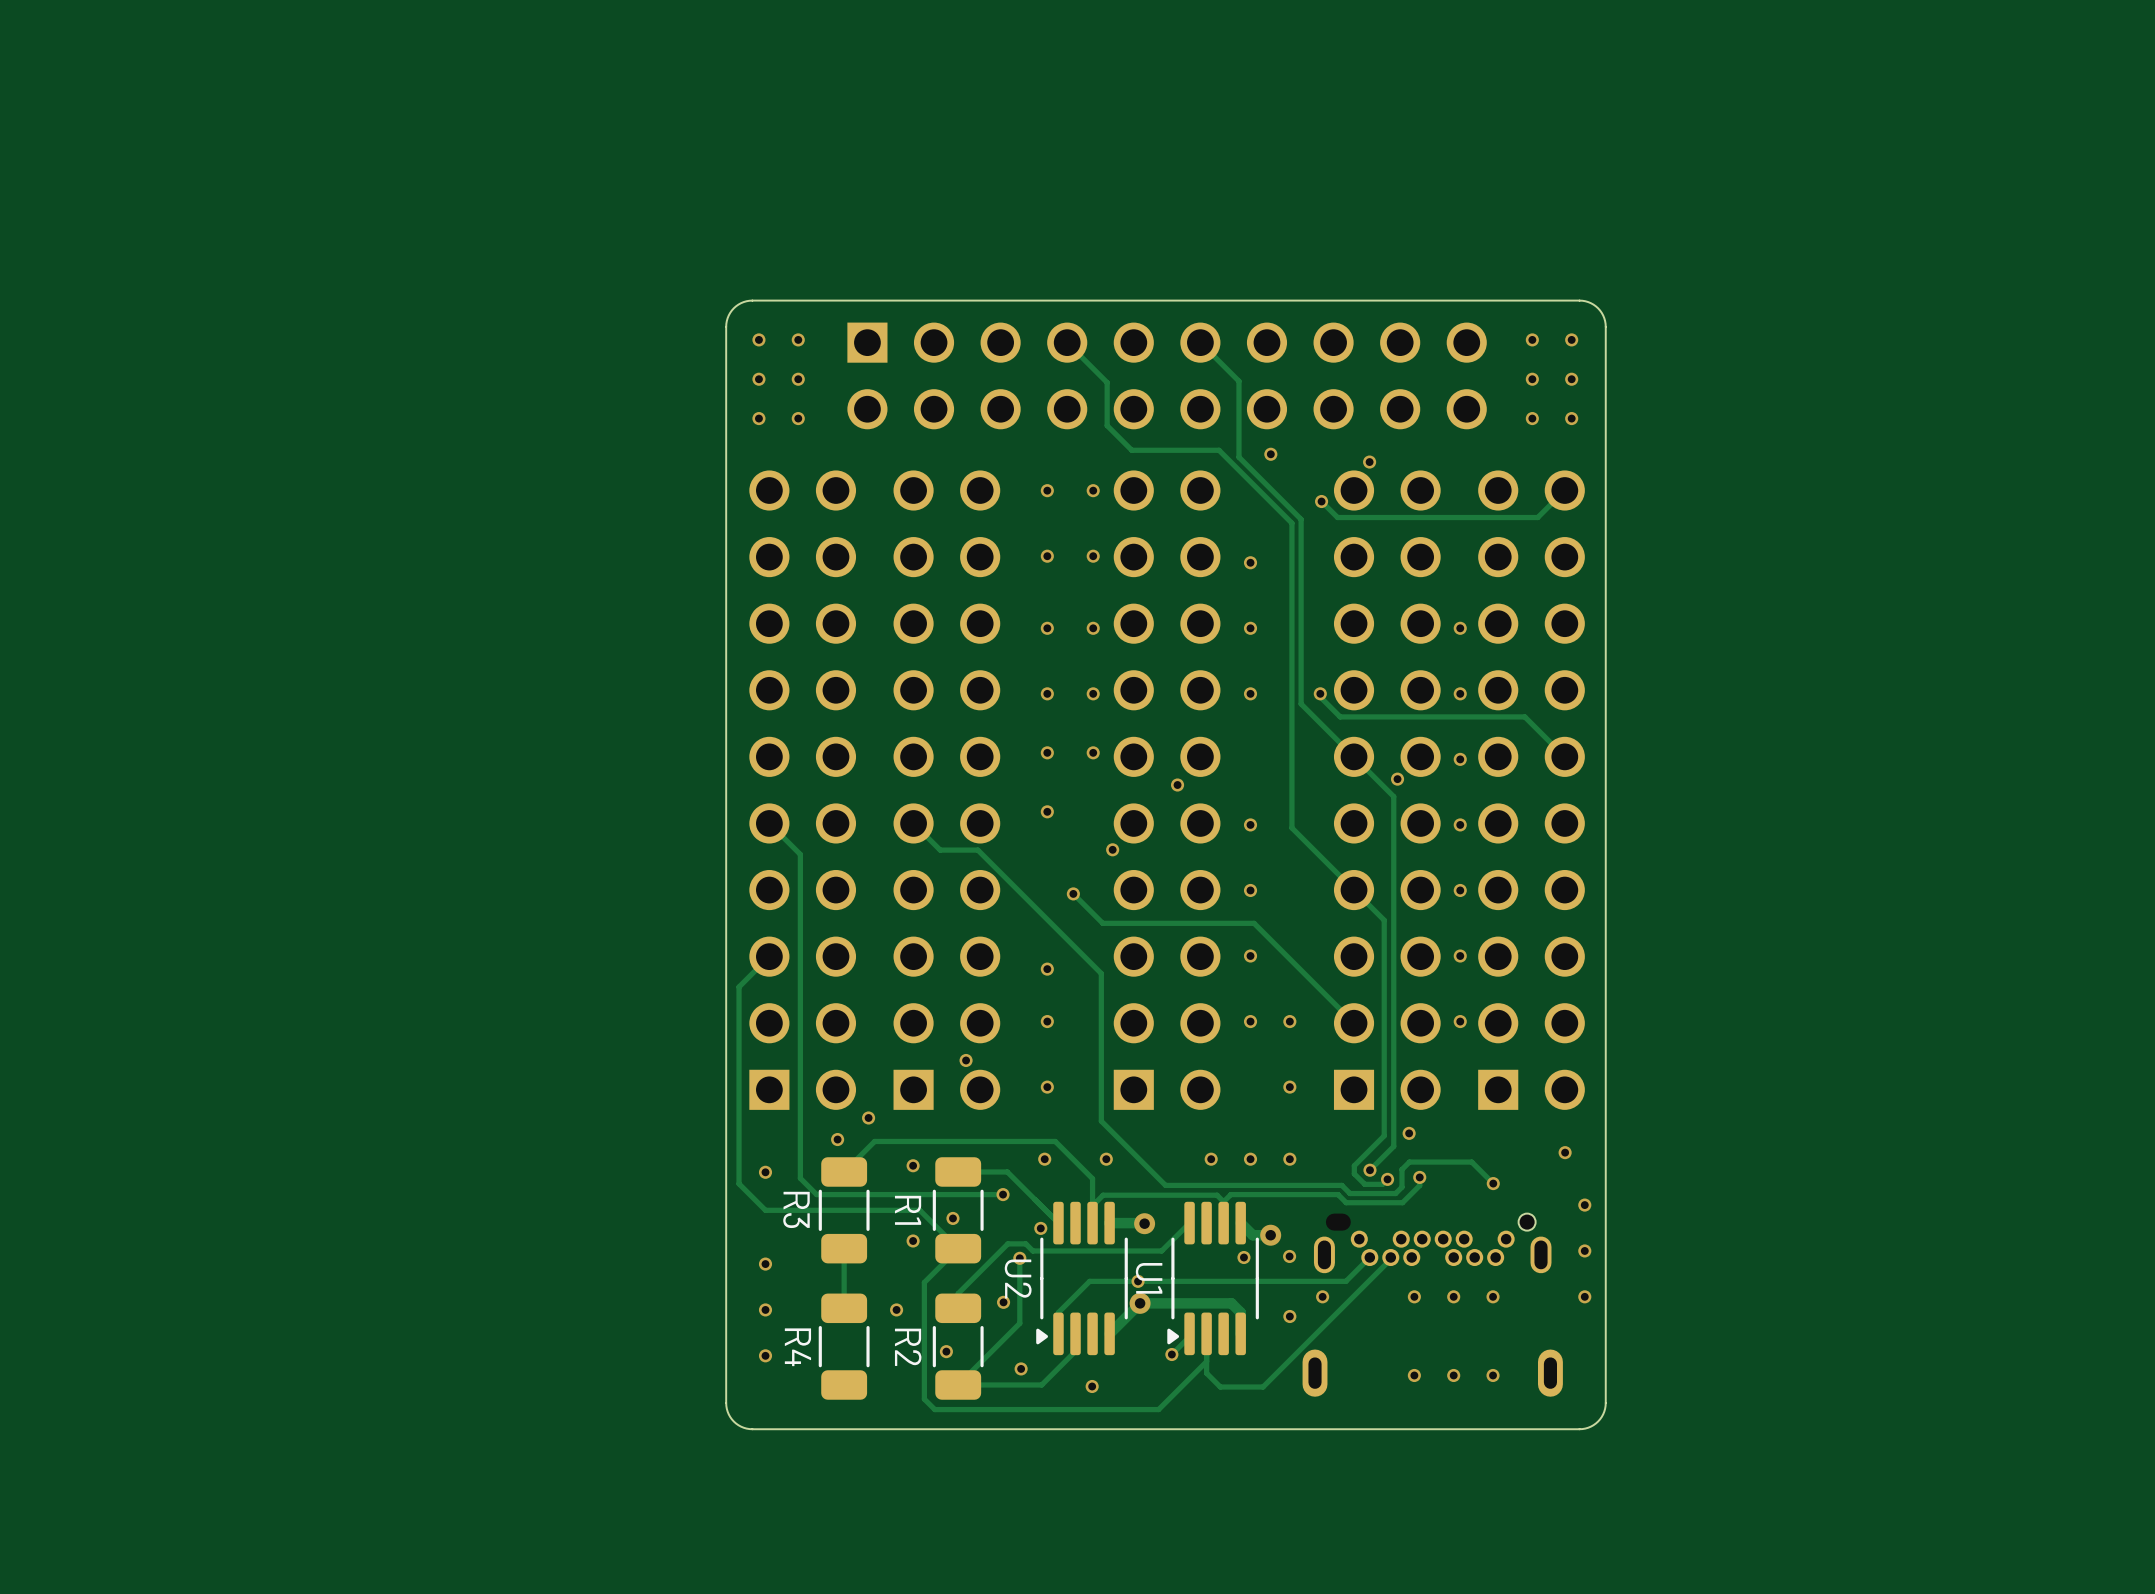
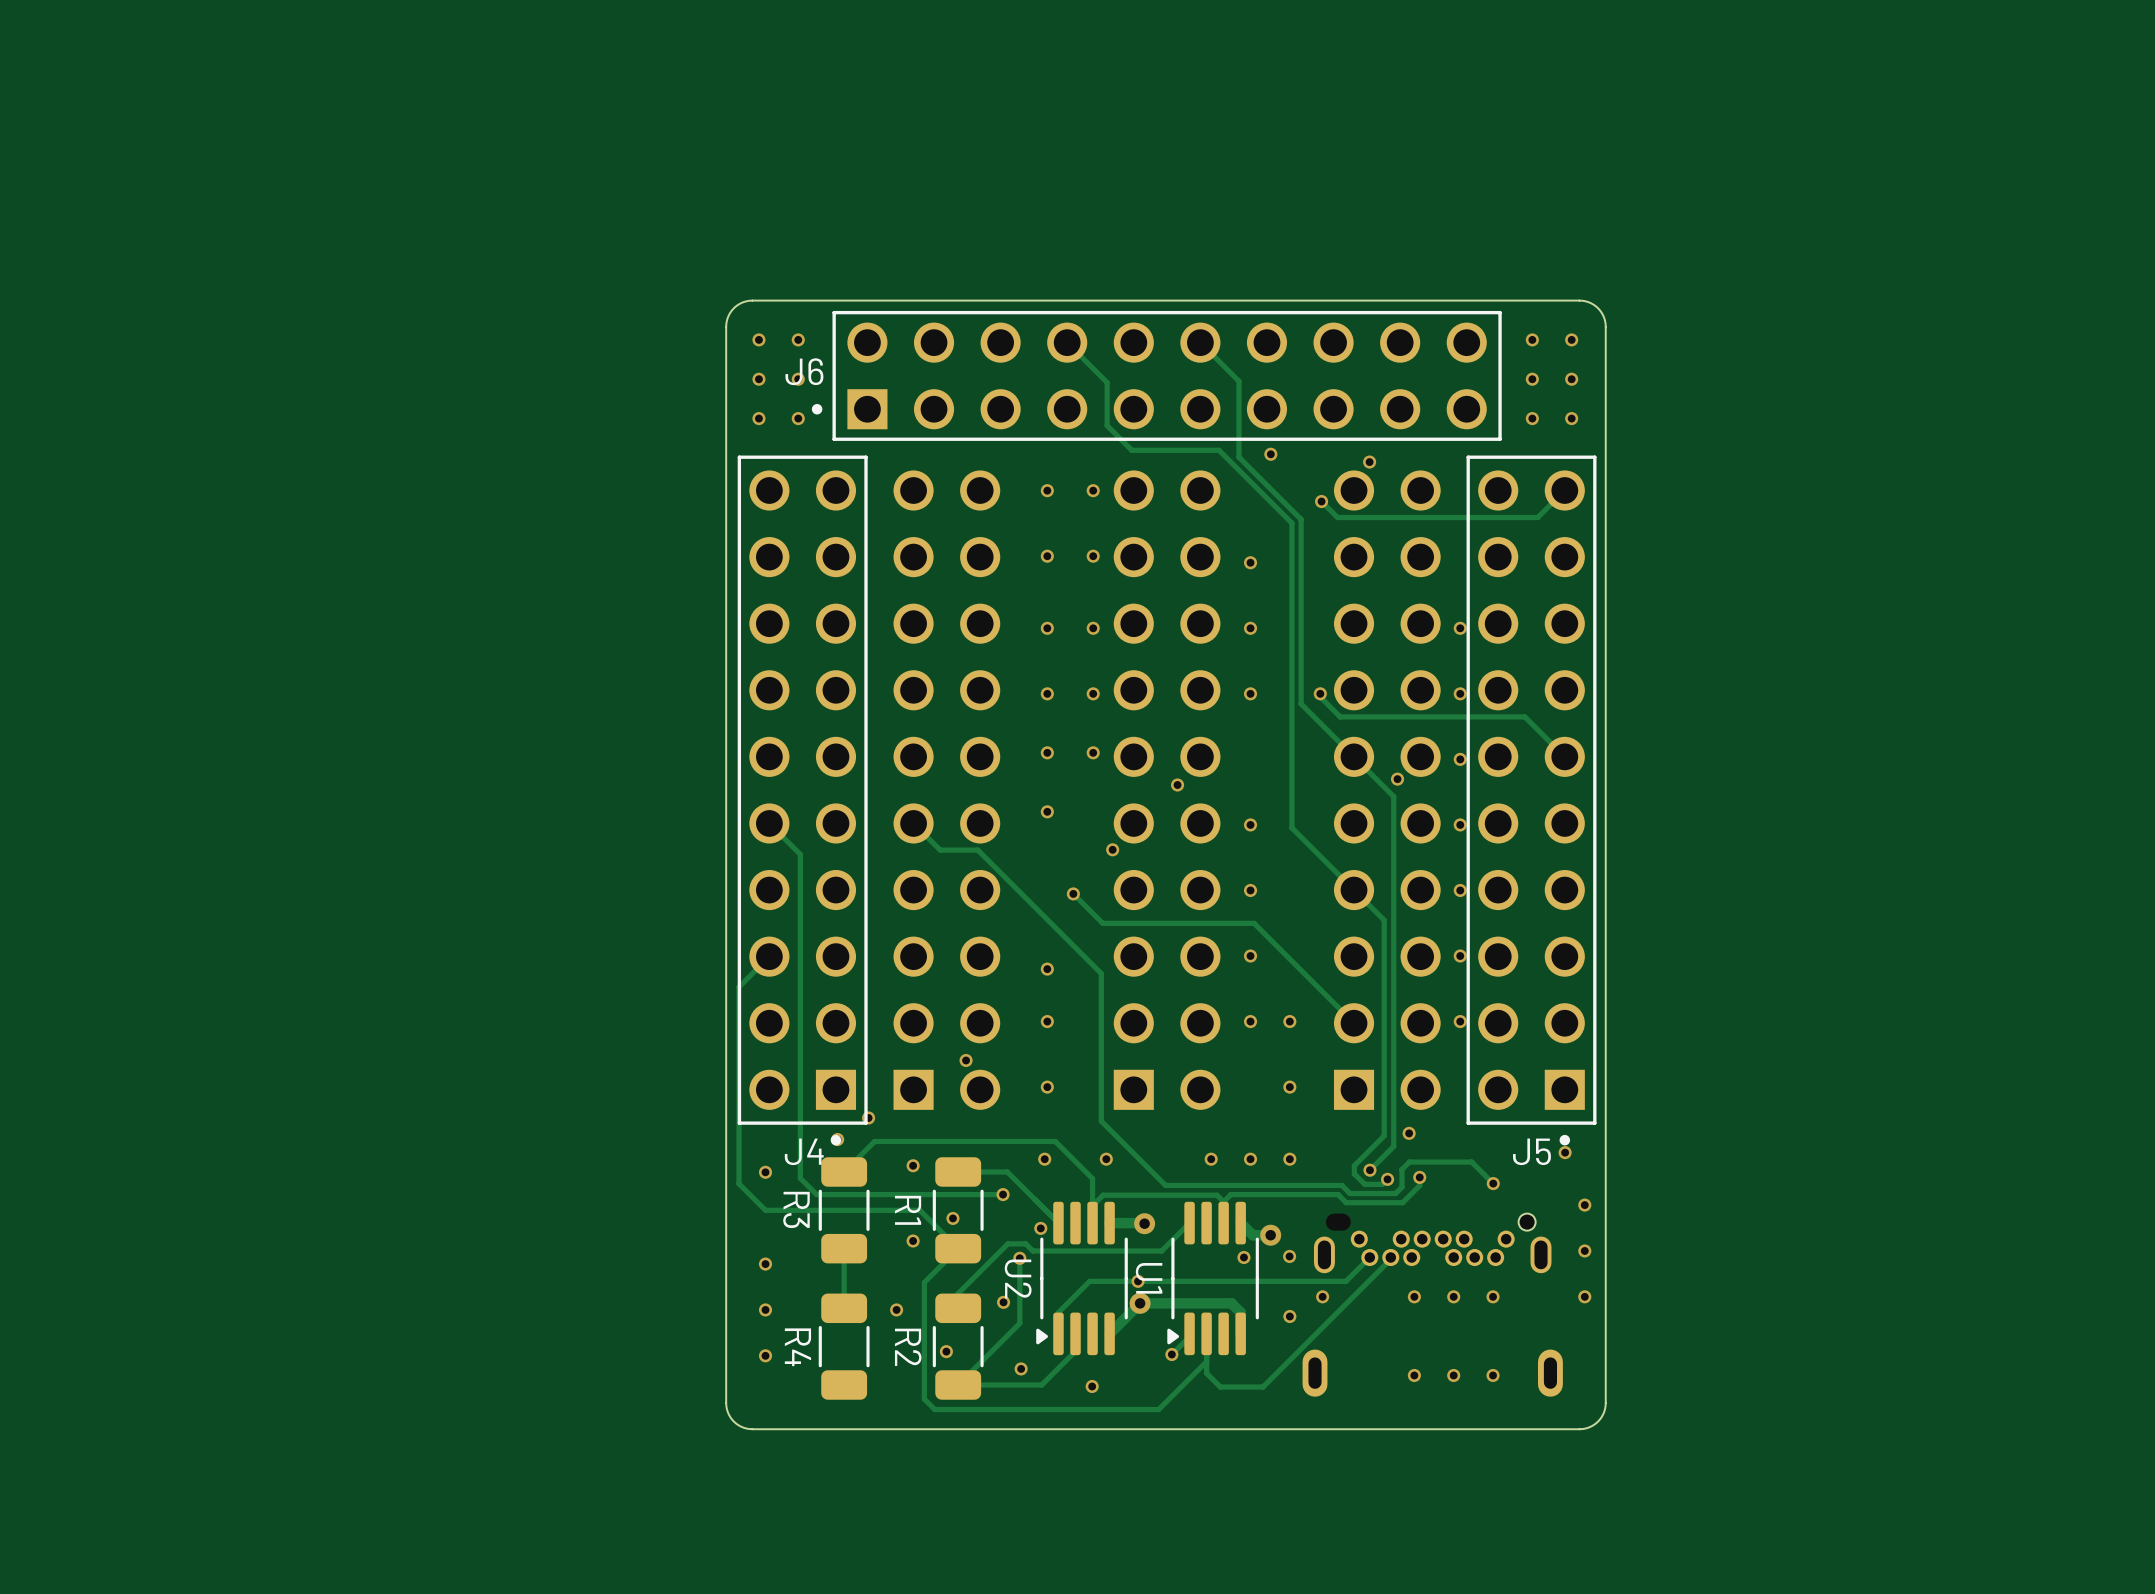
J6 side: top (1167, 375) -> bottom (1156, 375)
J4 side: top (802, 790) -> bottom (802, 800)
J5 side: top (1531, 790) -> bottom (1531, 800)

